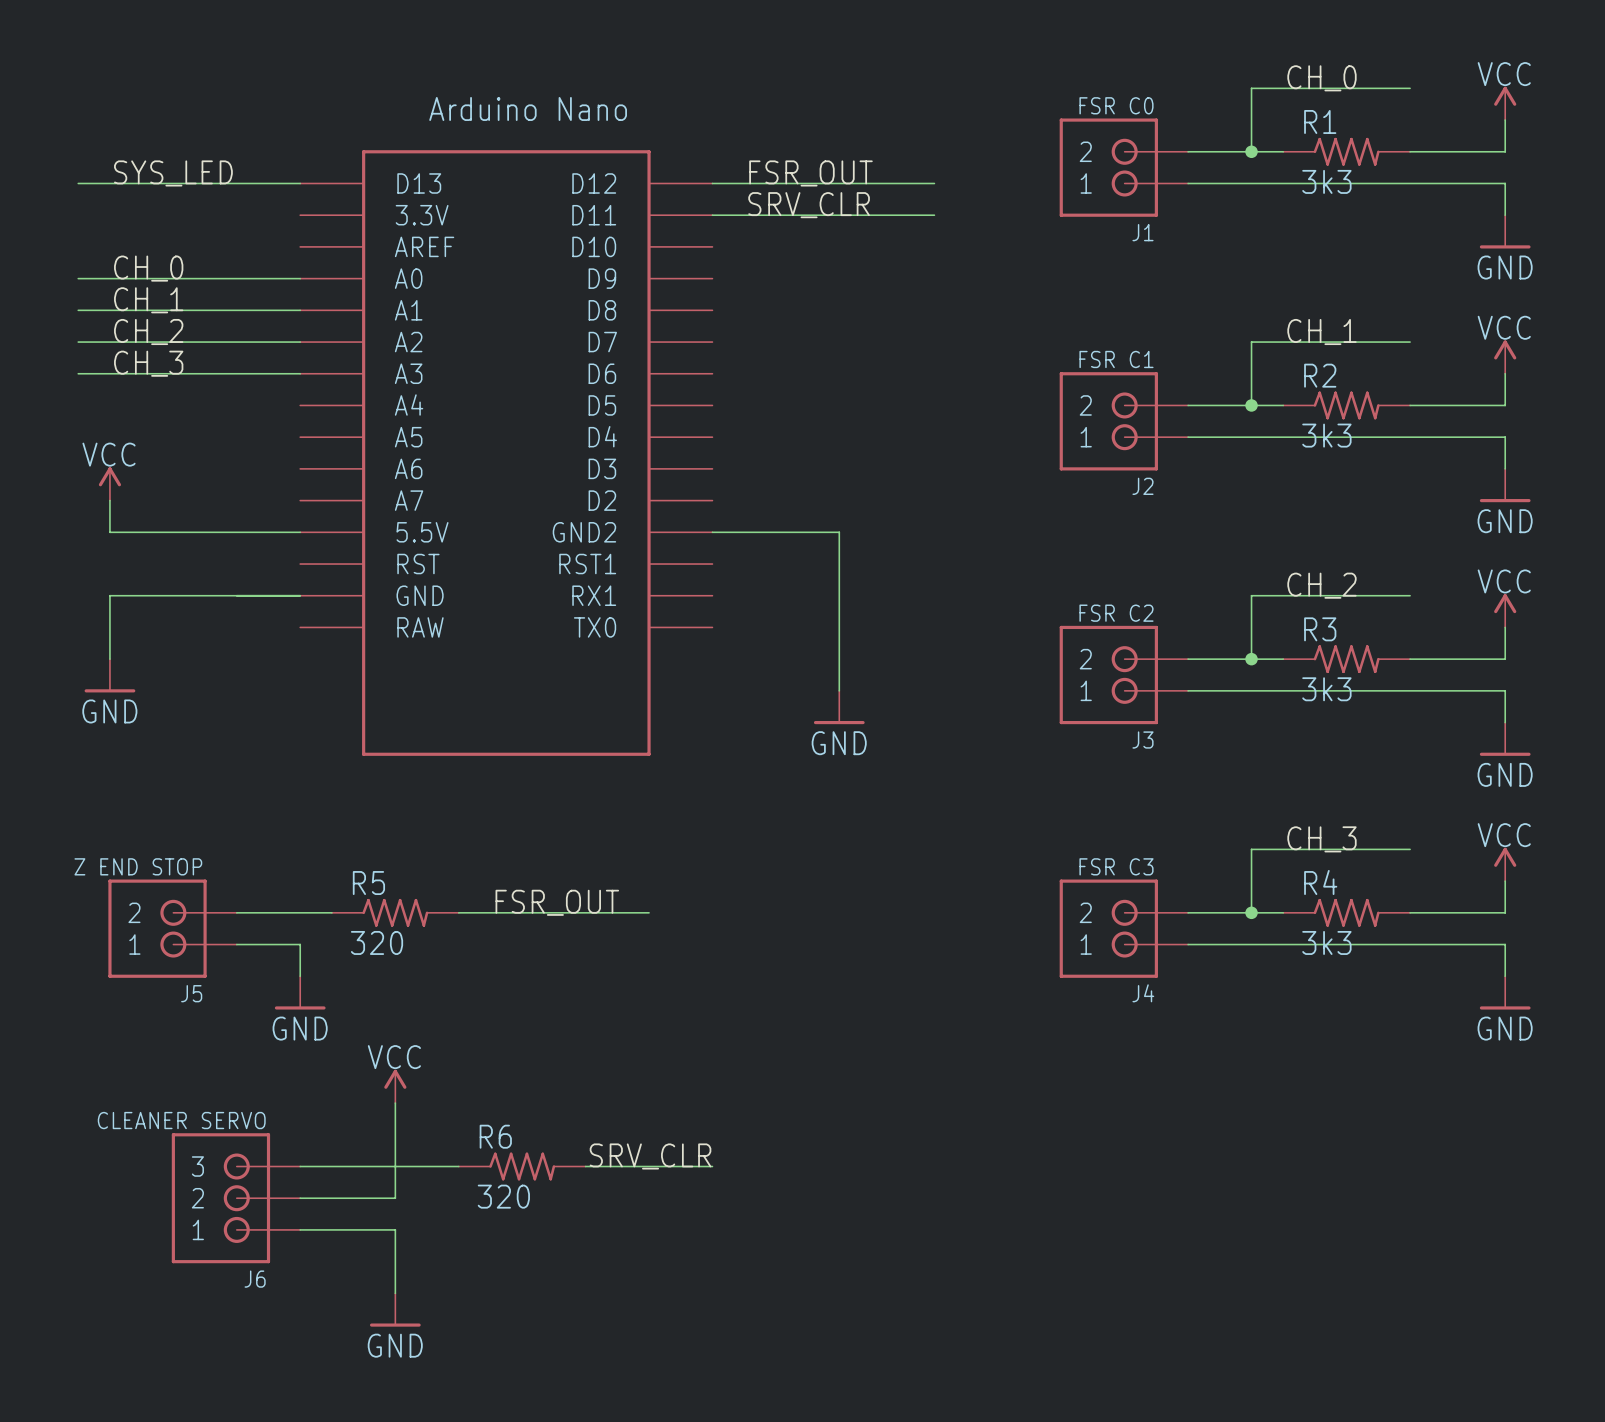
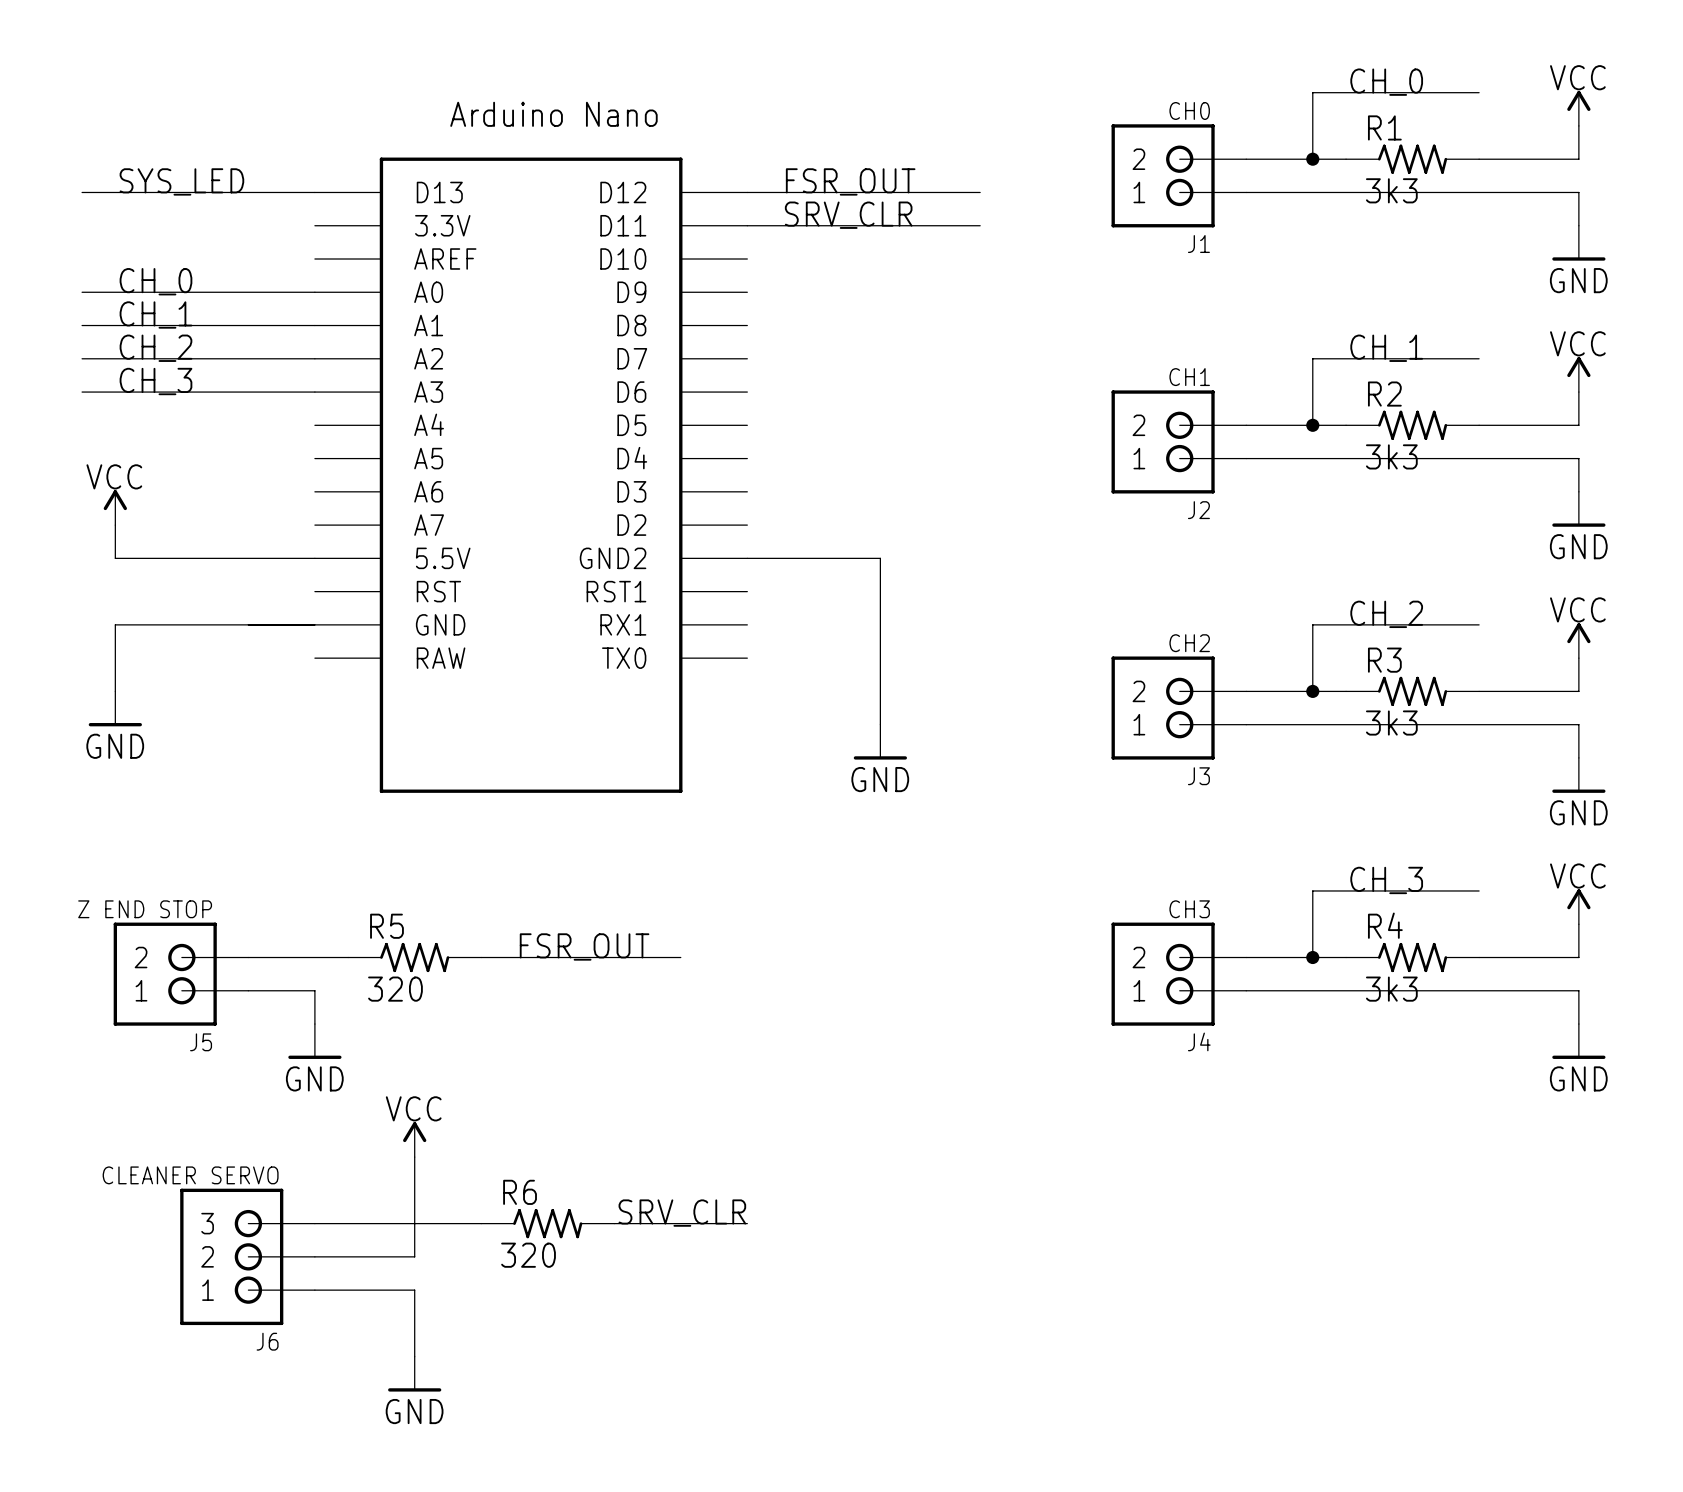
J1 value: FSR C0 (1116, 105) -> CH0 (1189, 110)
J2 value: FSR C1 (1116, 359) -> CH1 (1189, 377)
J3 value: FSR C2 (1116, 613) -> CH2 (1189, 643)
J4 value: FSR C3 (1116, 866) -> CH3 (1189, 909)

